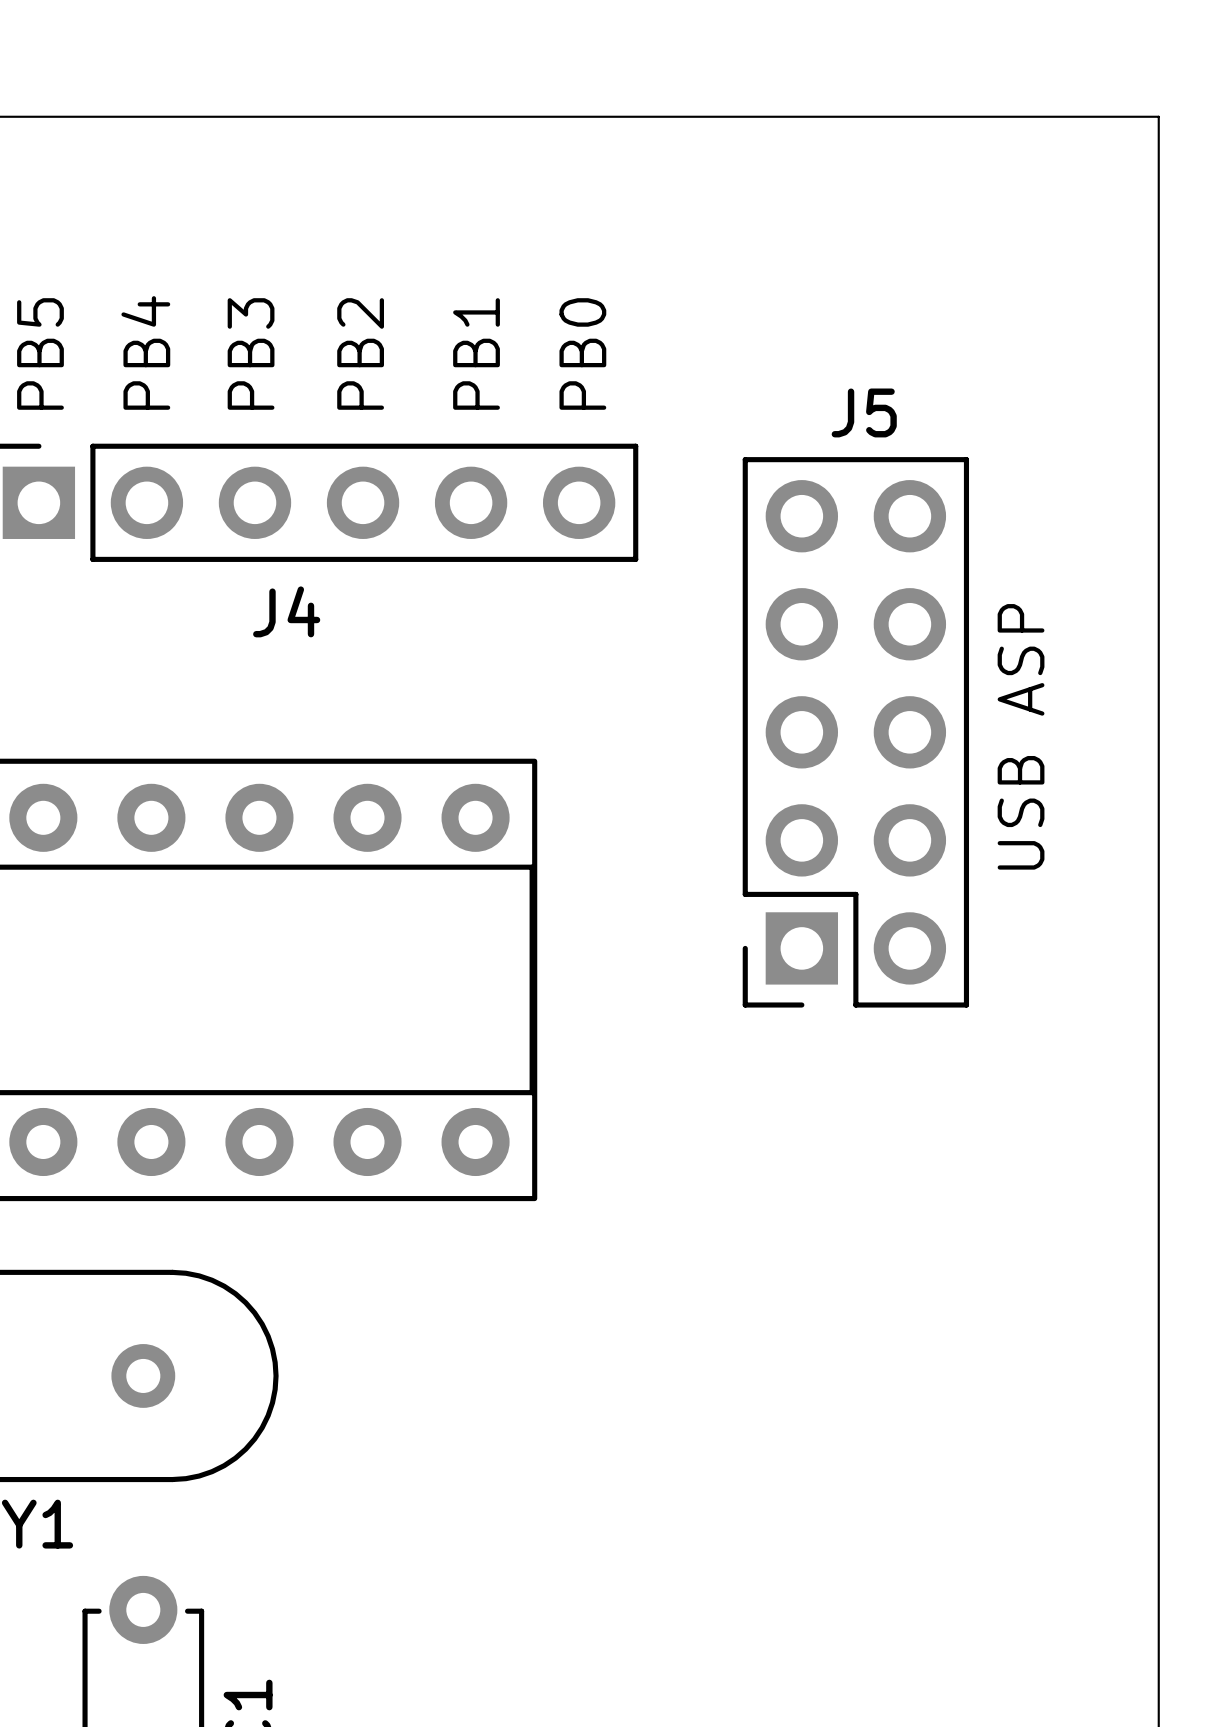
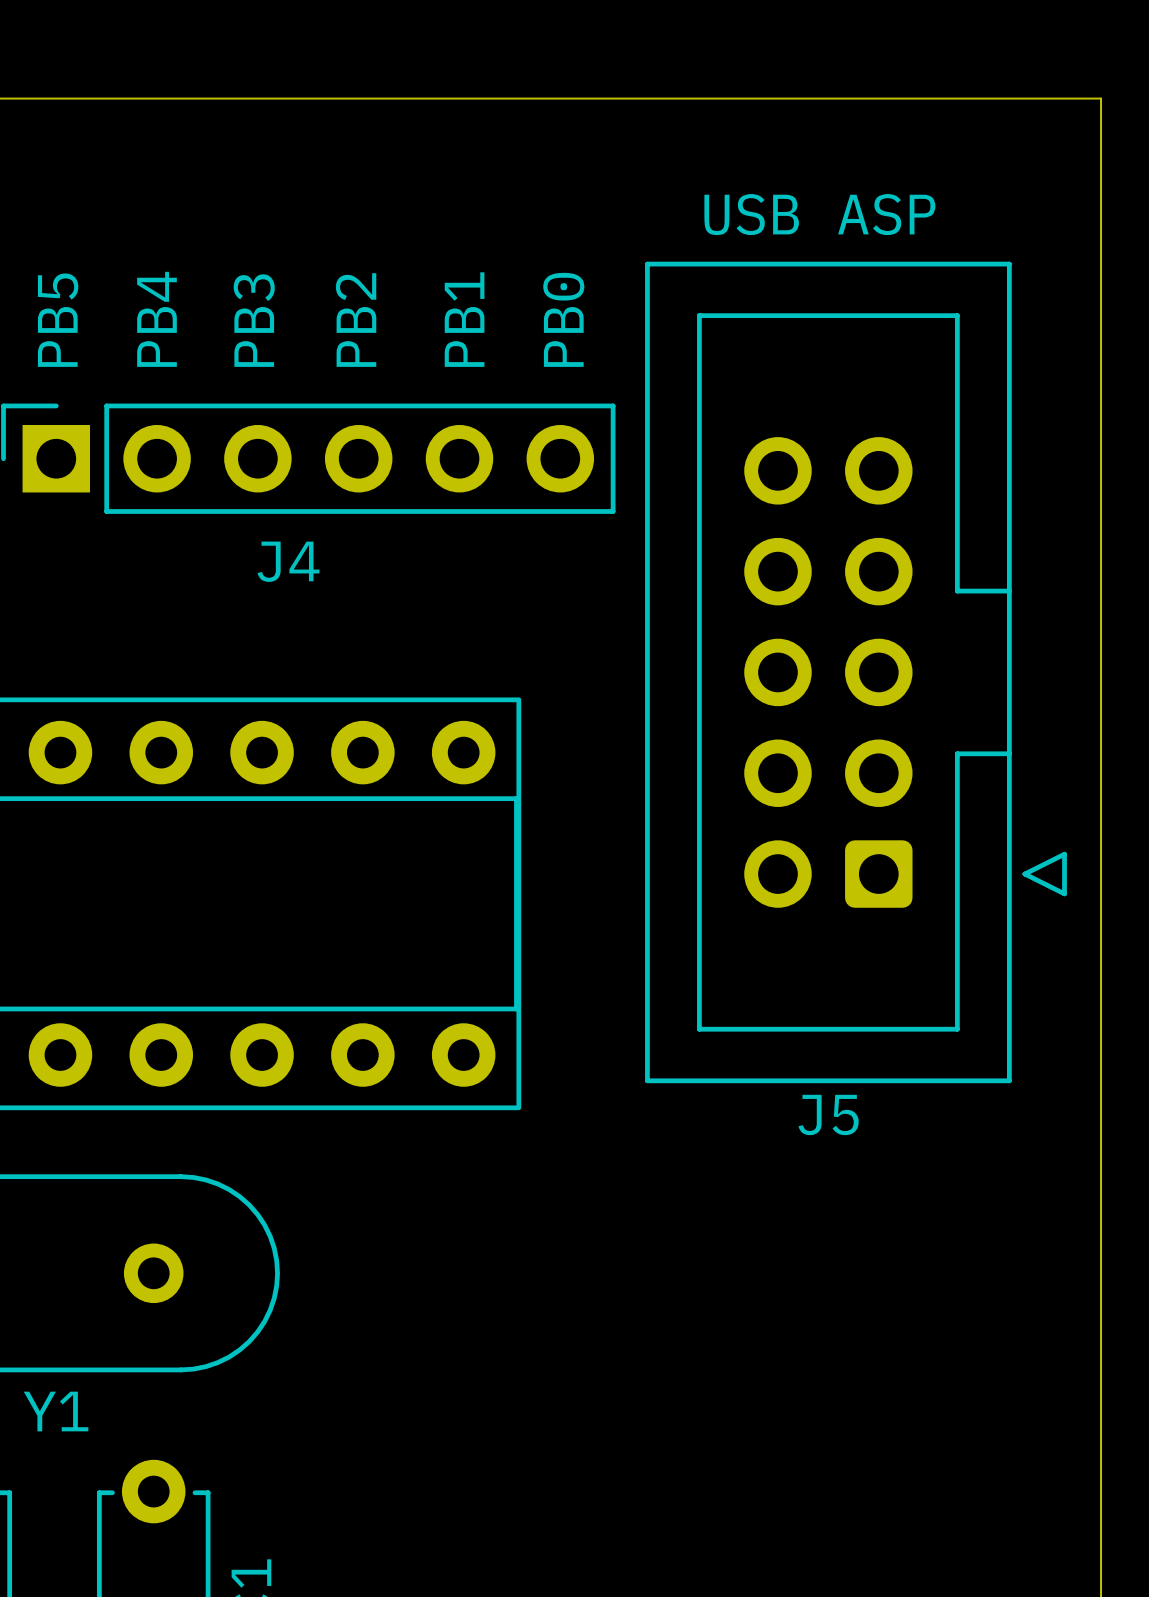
J5 name position: J5 (864, 412) -> J5 (828, 1114)
J5 footprint: [742, 457, 970, 1008] -> [645, 261, 1067, 1084]
text rotation: 0° (1021, 736) -> 90° clockwise (819, 214)
text position: USB ASP (1021, 736) -> USB ASP (819, 214)

